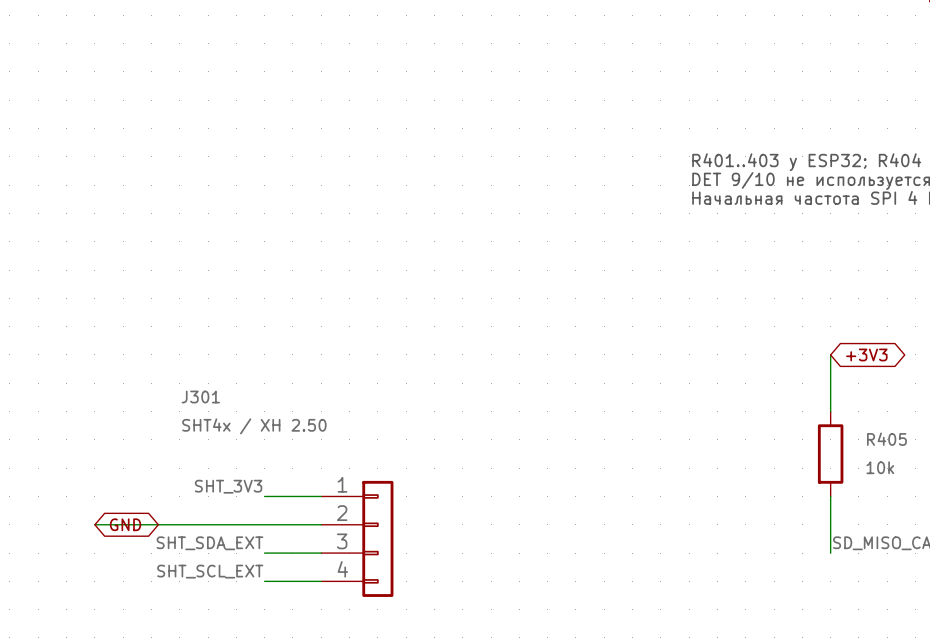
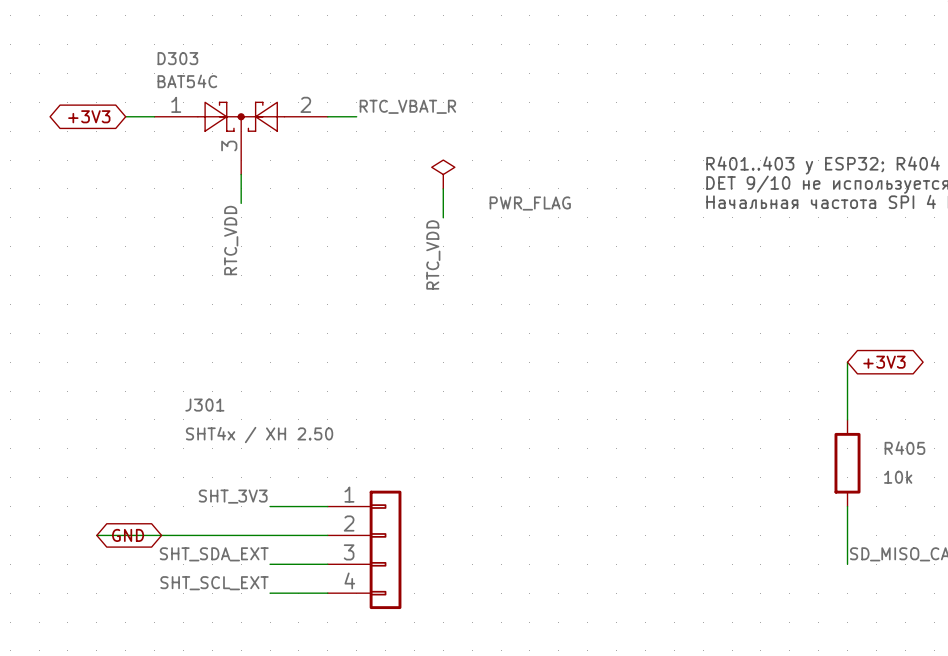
label: none -> RTC_VBAT_R (407, 106)
global label: none -> +3V3 (89, 116)
wire: none -> (125, 116) (154, 116)
wire: none -> (327, 116) (356, 116)
D303: none -> BAT54C (241, 138)
wire: none -> (241, 174) (241, 203)
power symbol: none -> PWR_FLAG (443, 174)
wire: none -> (443, 188) (443, 217)
label: none -> RTC_VDD (231, 240)
label: none -> RTC_VDD (433, 254)

